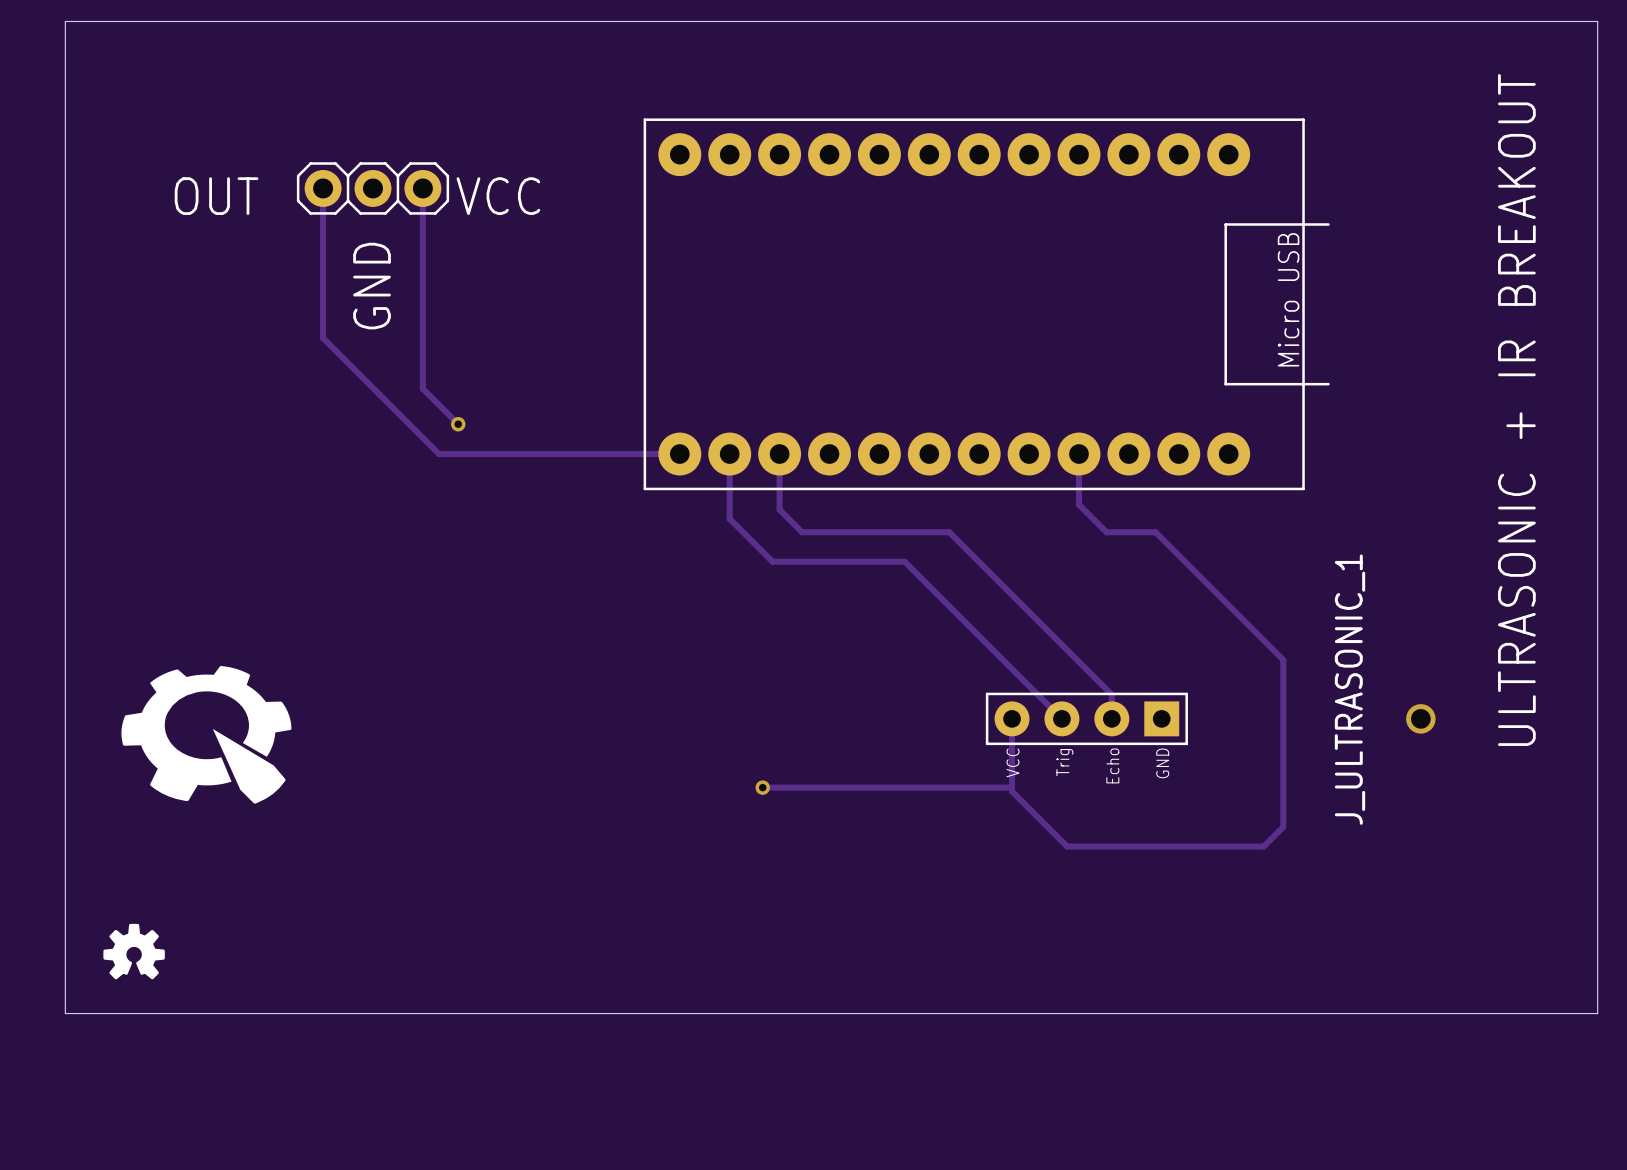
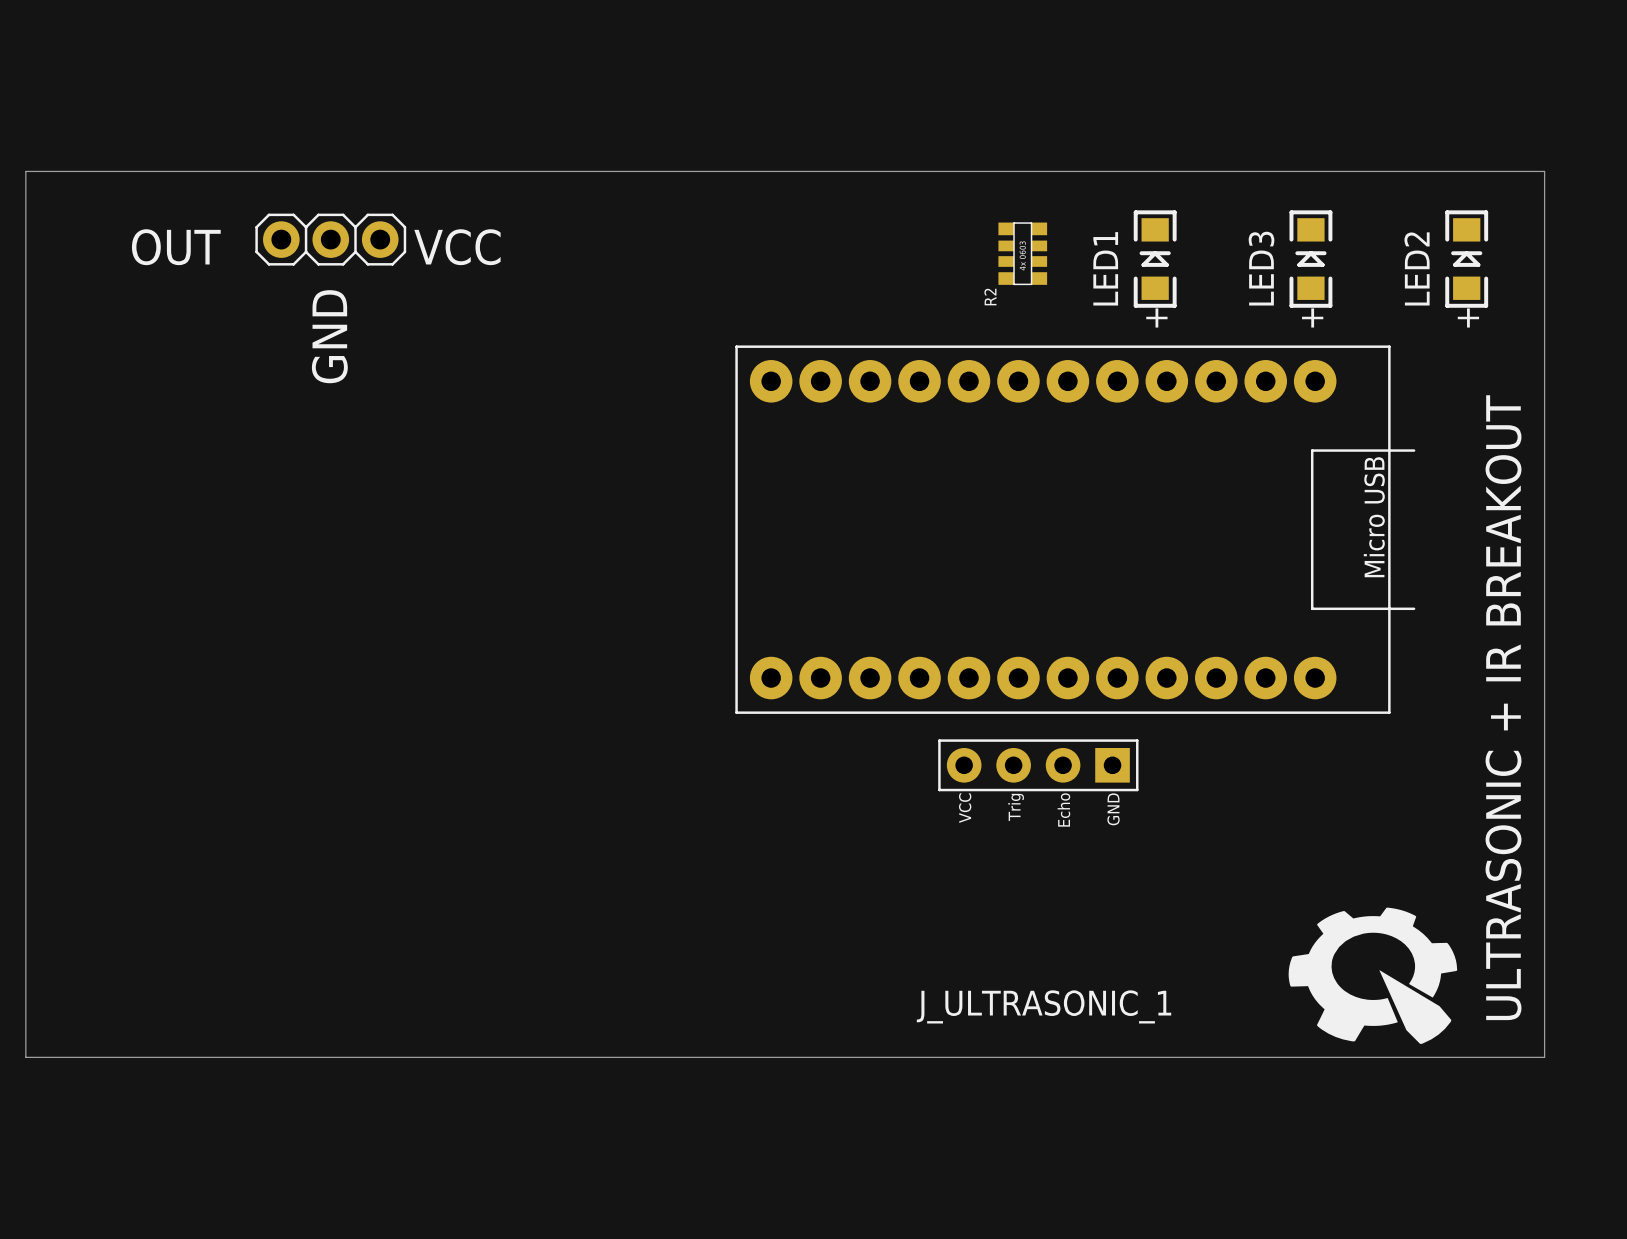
board edge: (65, 119) (65, 21) (1597, 21) (1597, 119) -> (25, 171) (1544, 171)
track: (323, 188) (323, 338) (438, 454) (679, 454) -> none
track: (422, 188) (422, 388) (458, 424) -> none
R2: none -> (1022, 253)
LED1: none -> (1155, 259)
LED3: none -> (1310, 259)
LED2: none -> (1466, 259)
part position: (986, 304) -> (1075, 529)
text position: ULTRASONIC + IR BREAKOUT (1516, 409) -> ULTRASONIC + IR BREAKOUT (1503, 707)
via: (458, 424) -> none
track: (729, 454) (729, 518) (772, 561) (904, 561) (1061, 718) -> none
track: (779, 454) (779, 509) (802, 532) (949, 532) (1111, 694) (1111, 718) -> none
track: (1078, 454) (1078, 504) (1106, 532) (1155, 532) (1283, 659) (1283, 826) (1263, 846) (1067, 846) (1012, 791) (1012, 718) -> none
drawing: [121, 666, 292, 804] -> none
J_ULTRASONIC_1 name rotation: 0° (1350, 689) -> 90° clockwise (1044, 1006)
J_ULTRASONIC_1 name position: J_ULTRASONIC_1 (1350, 689) -> J_ULTRASONIC_1 (1044, 1006)
via: (1420, 718) -> none
track: (762, 787) (1012, 787) -> none
via: (762, 787) -> none
drawing: none -> [1288, 907, 1458, 1044]
drawing: [103, 923, 165, 980] -> none

